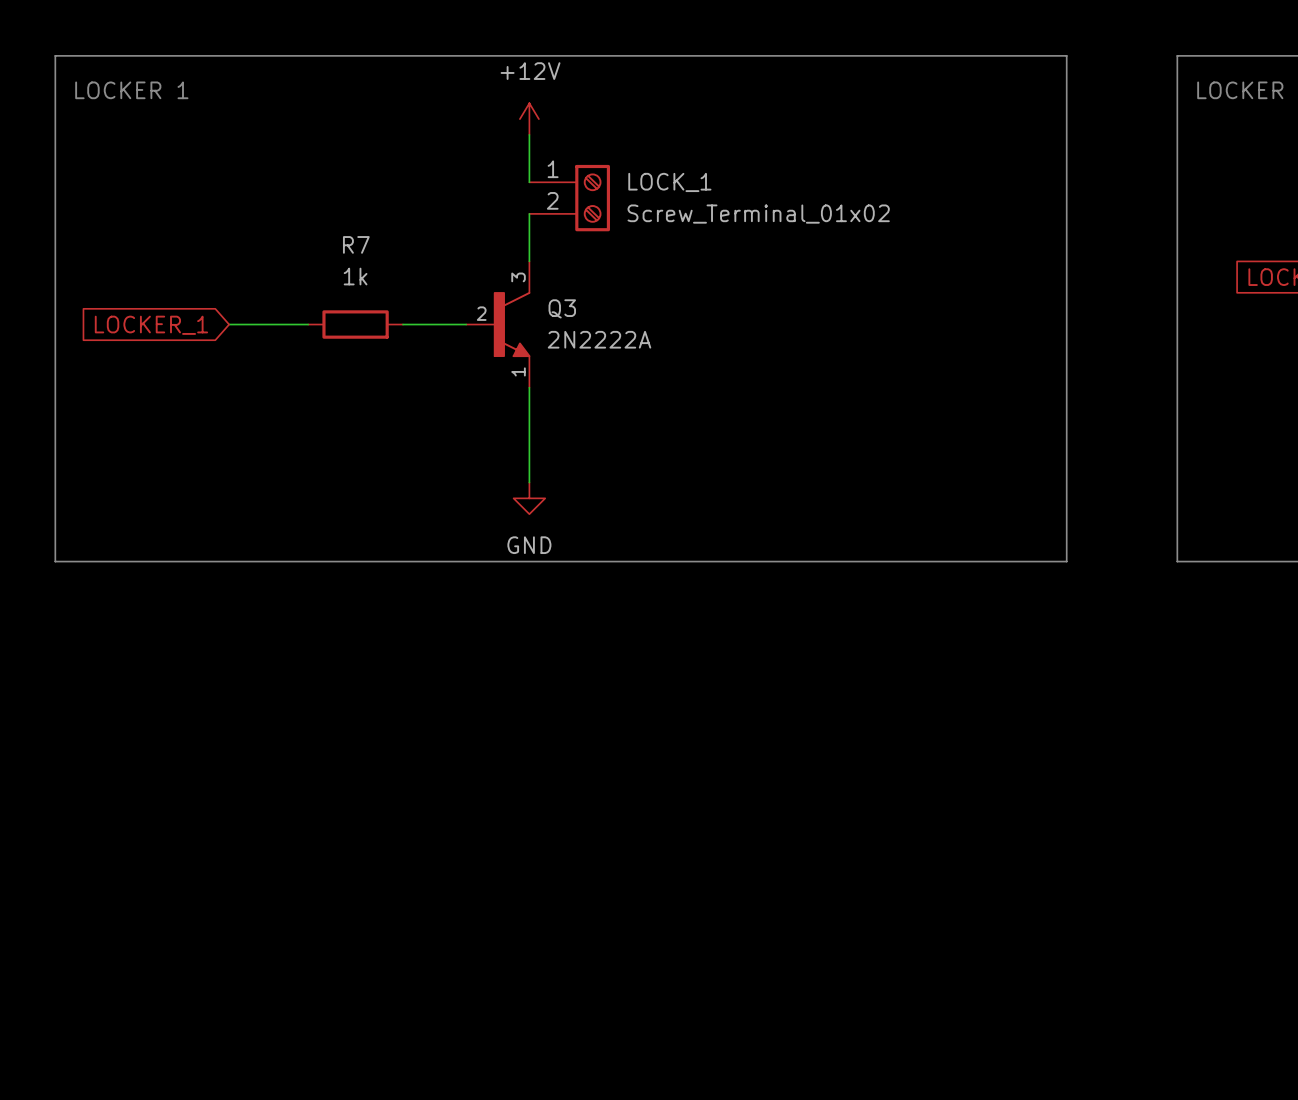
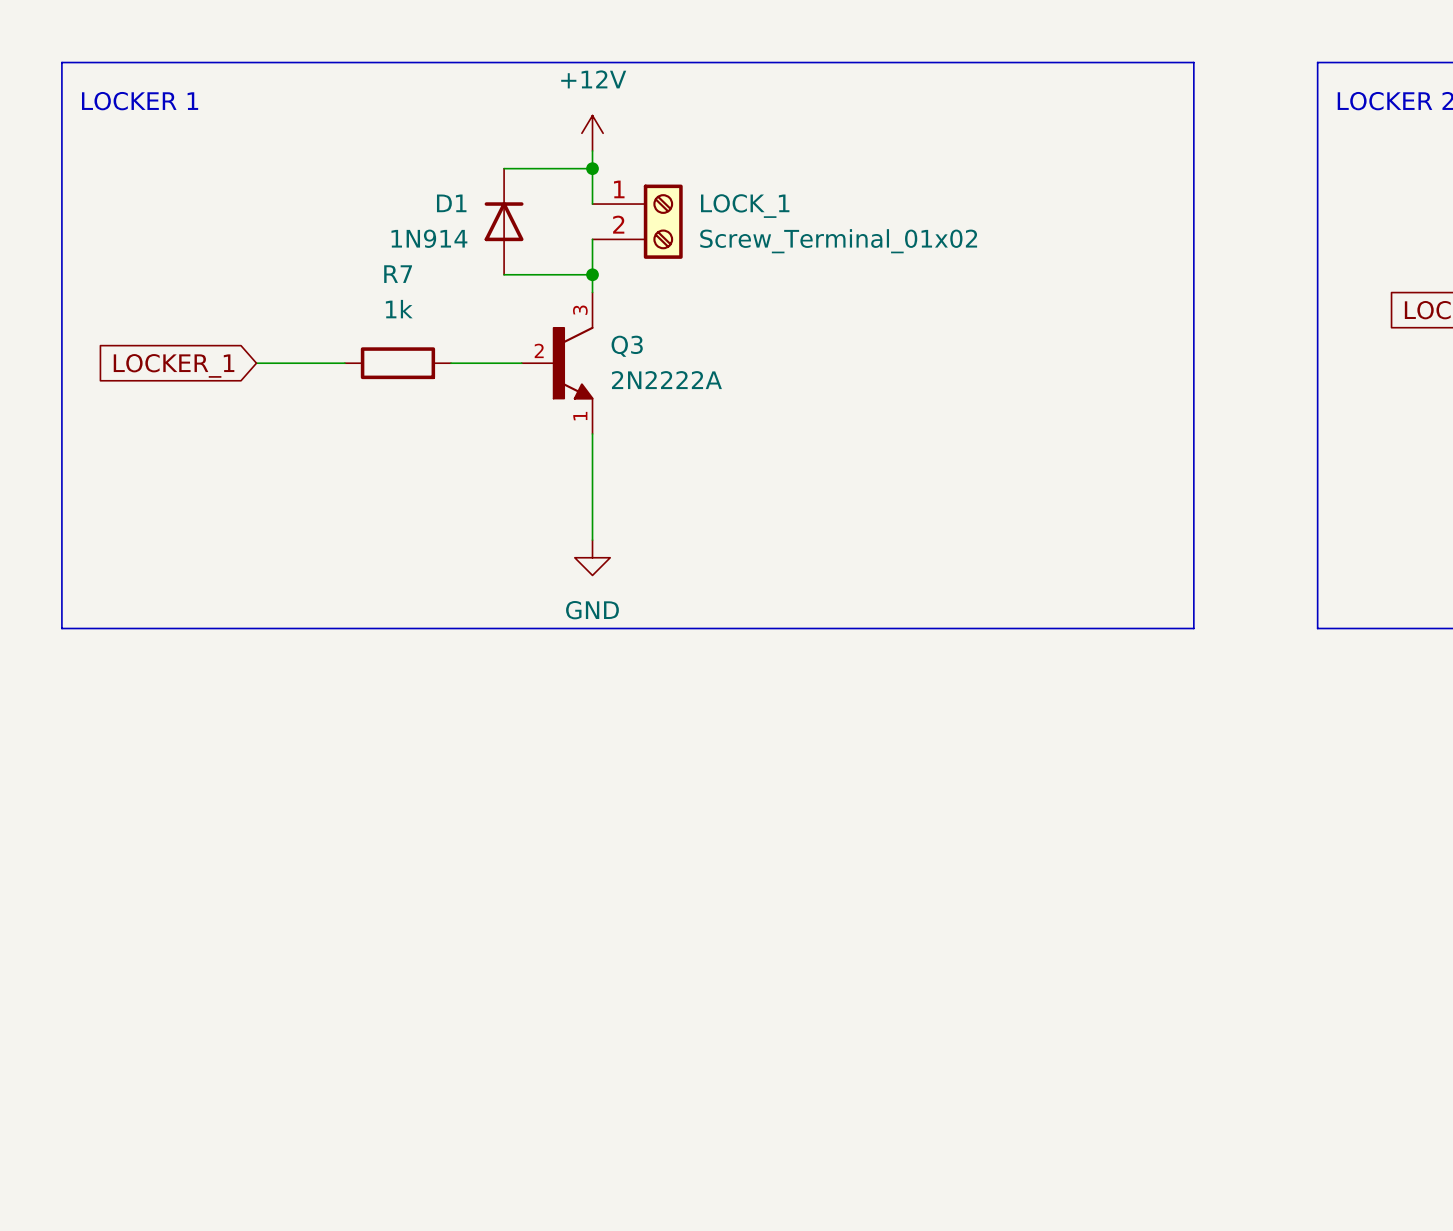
wire: none -> (504, 168) (592, 168)
junction: none -> (592, 168)
D1: none -> 1N914 (504, 221)
wire: none -> (504, 274) (592, 274)
junction: none -> (592, 274)

